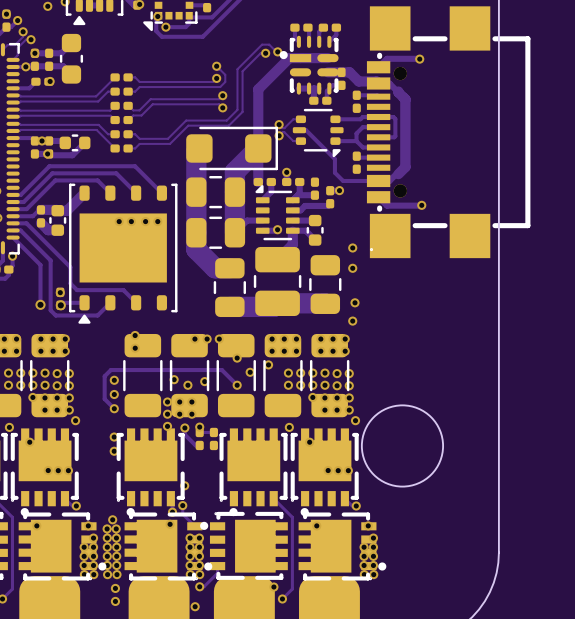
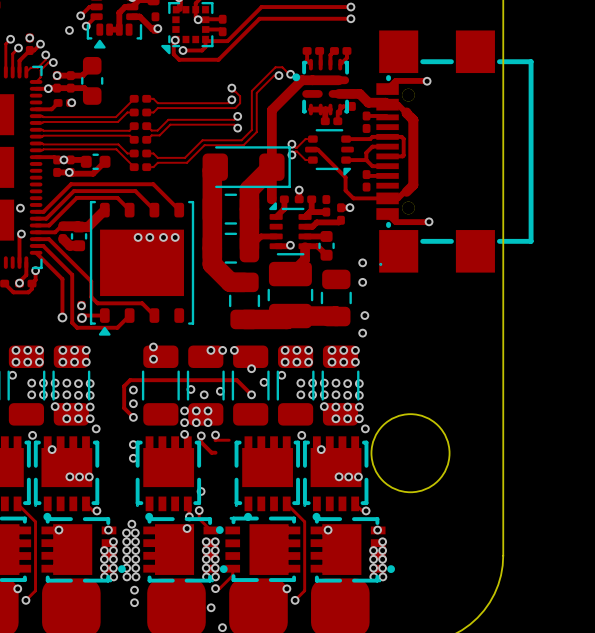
part: (199, 438) -> none
part: (213, 438) -> none

